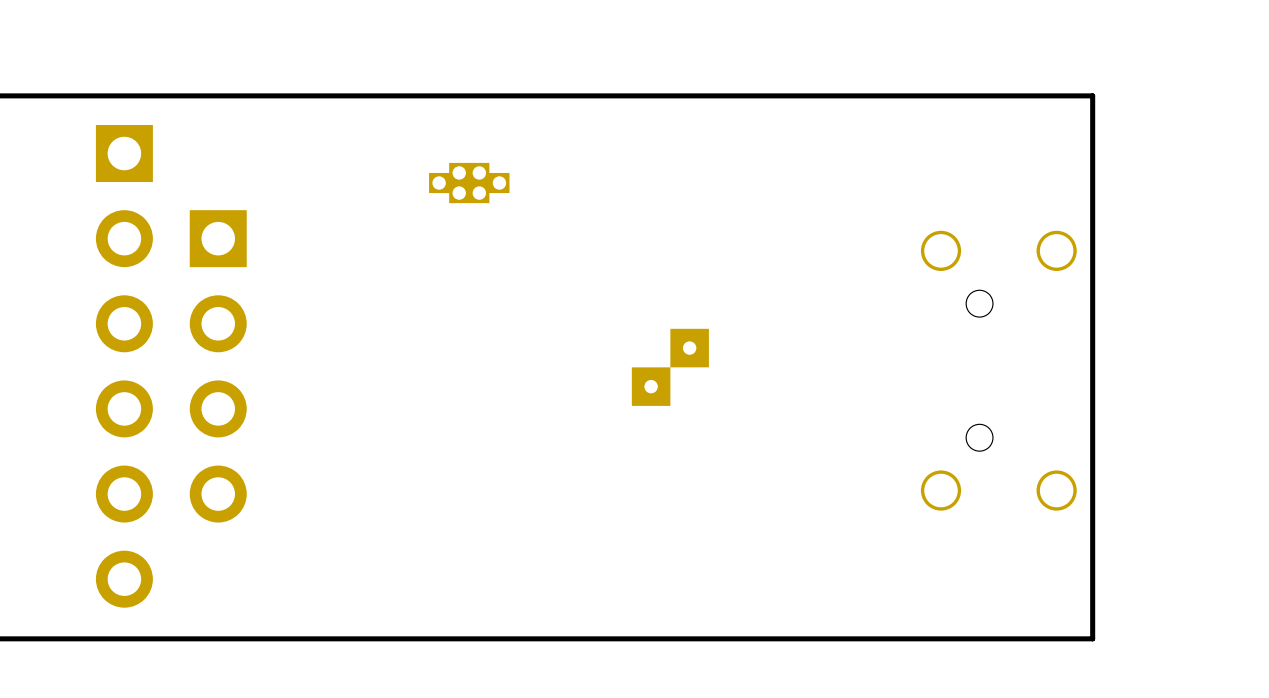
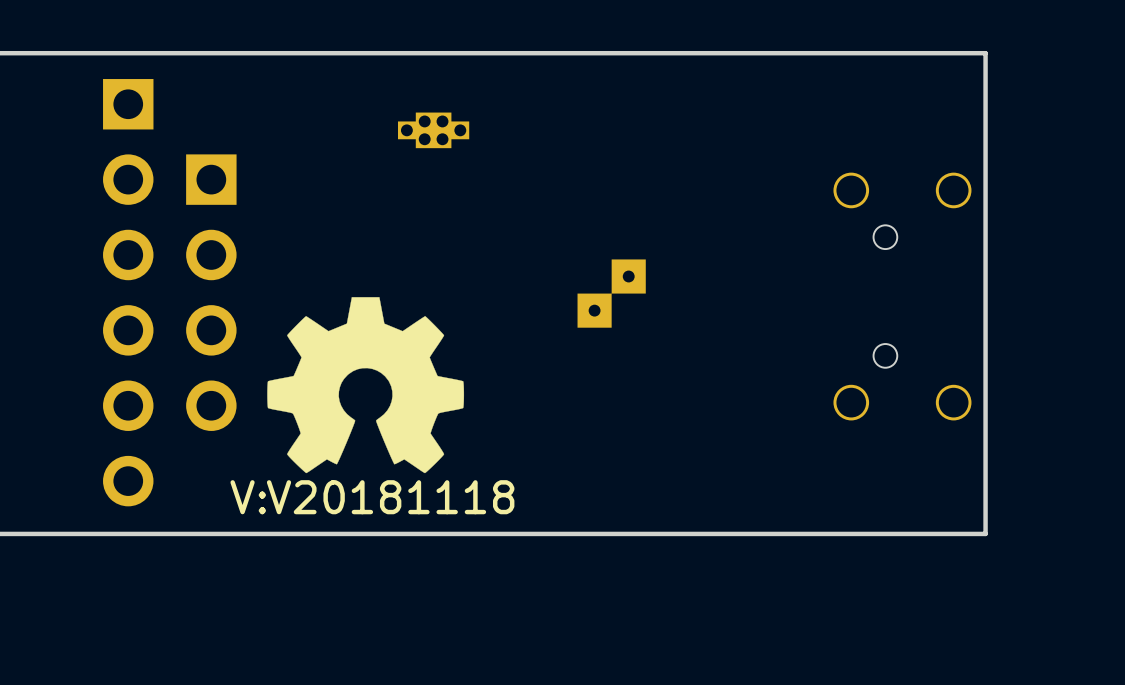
drawing: none -> [267, 297, 465, 474]

